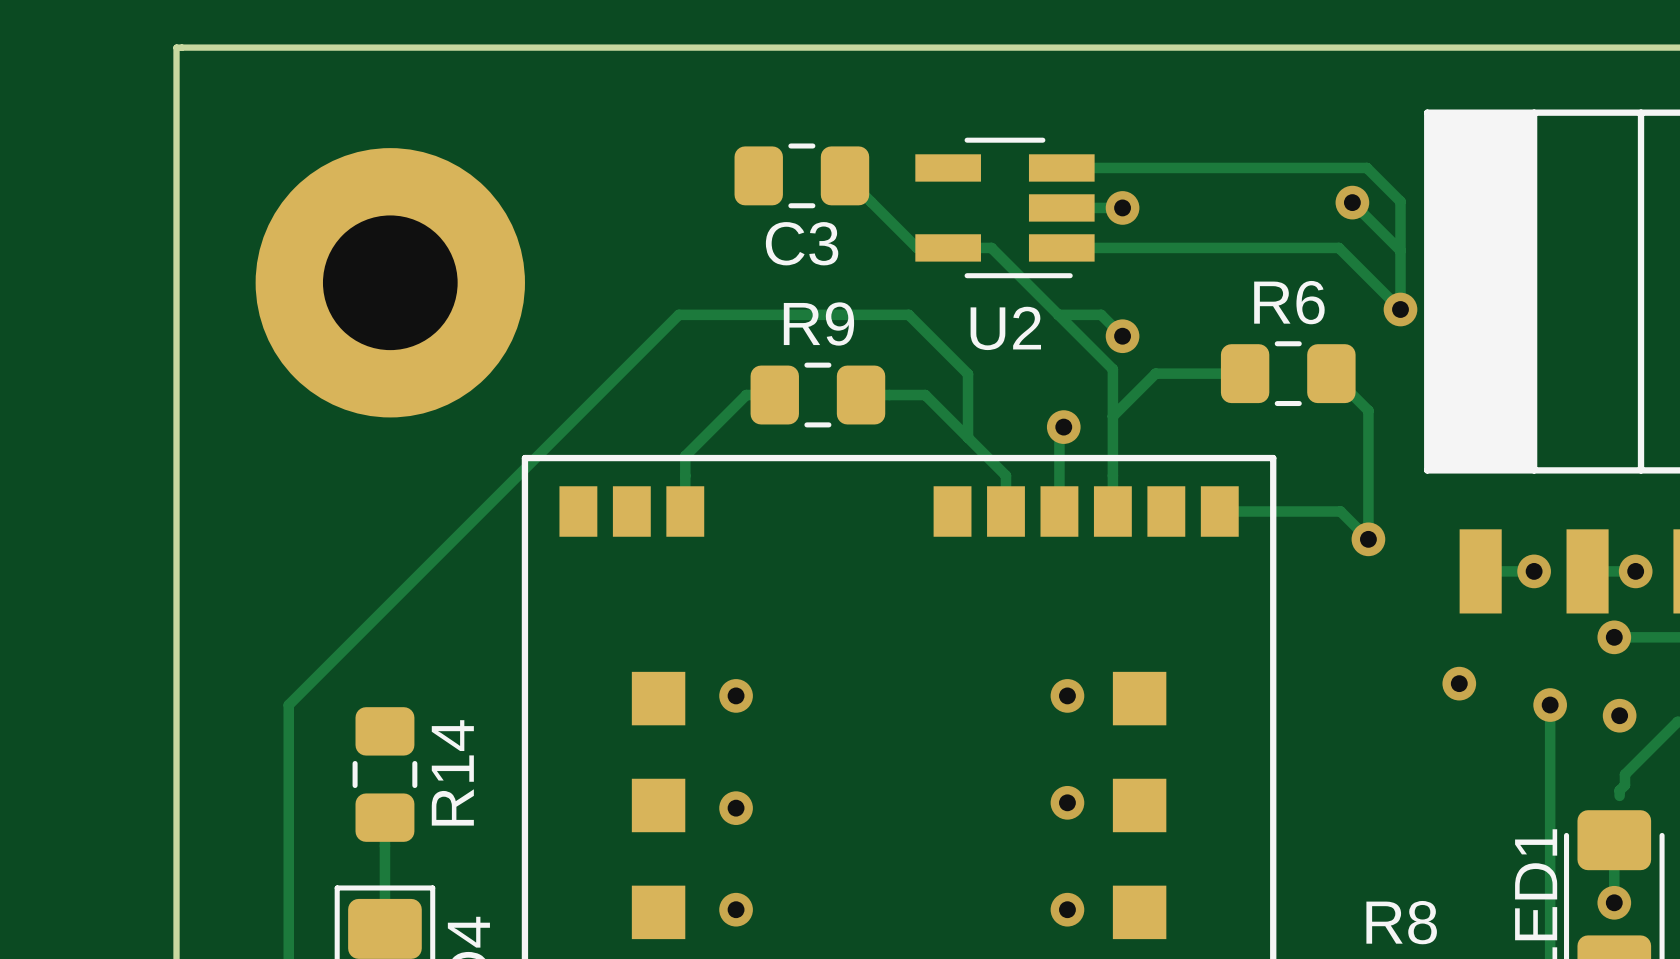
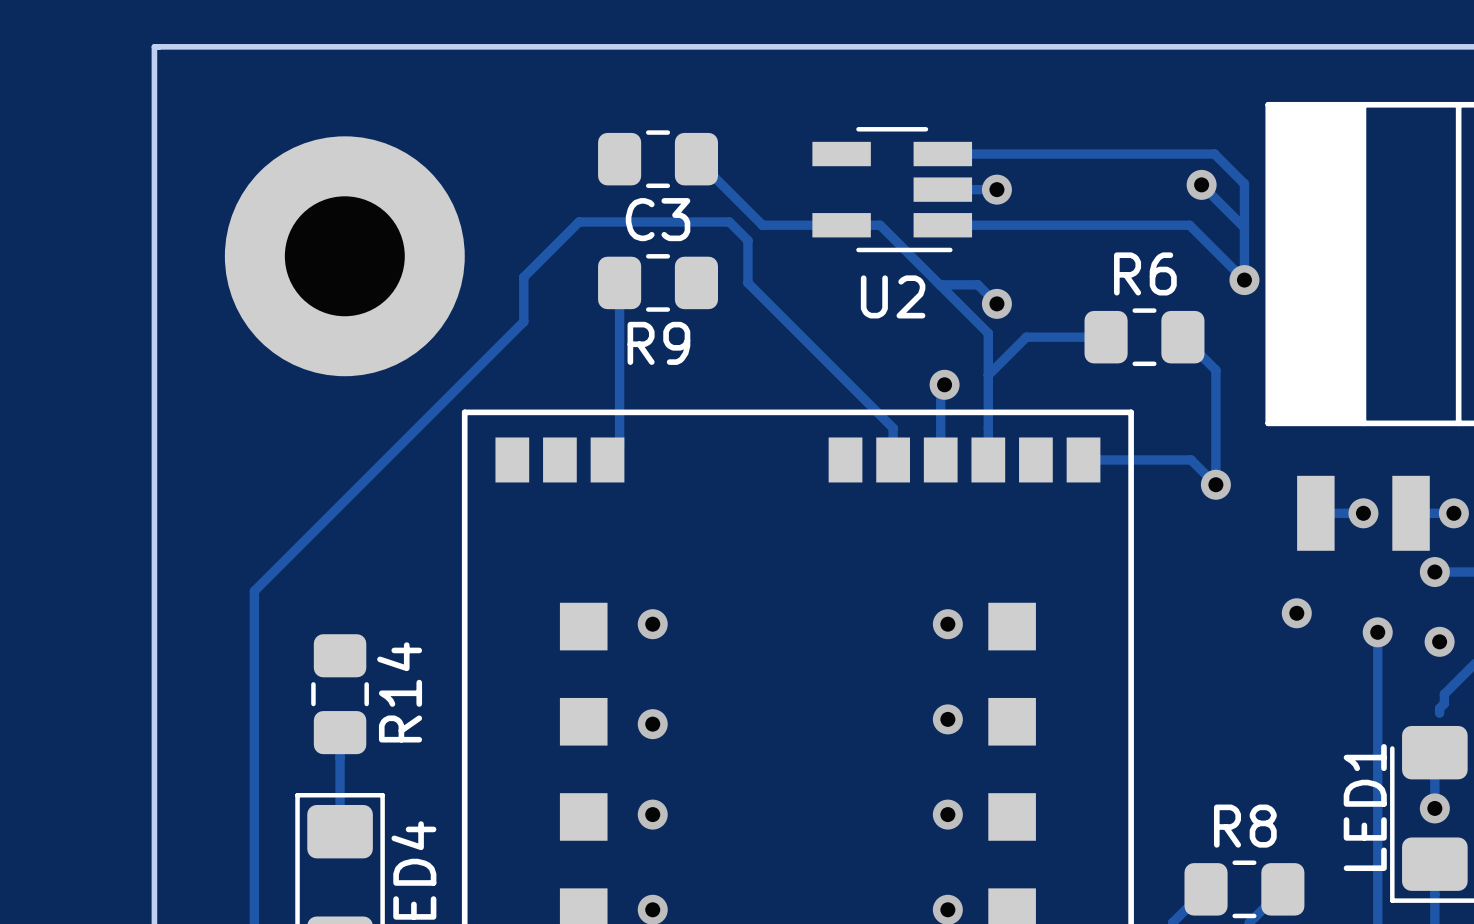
C3 position: (801, 175) -> (658, 159)
track: (845, 175) (917, 247) -> (696, 159) (762, 225) (813, 225)
R9 name position: R9 (818, 323) -> R9 (658, 343)
track: (774, 395) (746, 395) (685, 456) (685, 511) -> (619, 282) (619, 447) (607, 459)
R9 position: (817, 395) -> (658, 282)
track: (861, 395) (925, 395) -> none
track: (968, 437) (968, 374) (908, 314) (678, 314) (288, 705) -> (821, 356) (747, 282) (747, 240) (729, 222) (579, 222) (523, 277) (523, 321) (254, 591) (254, 632)

